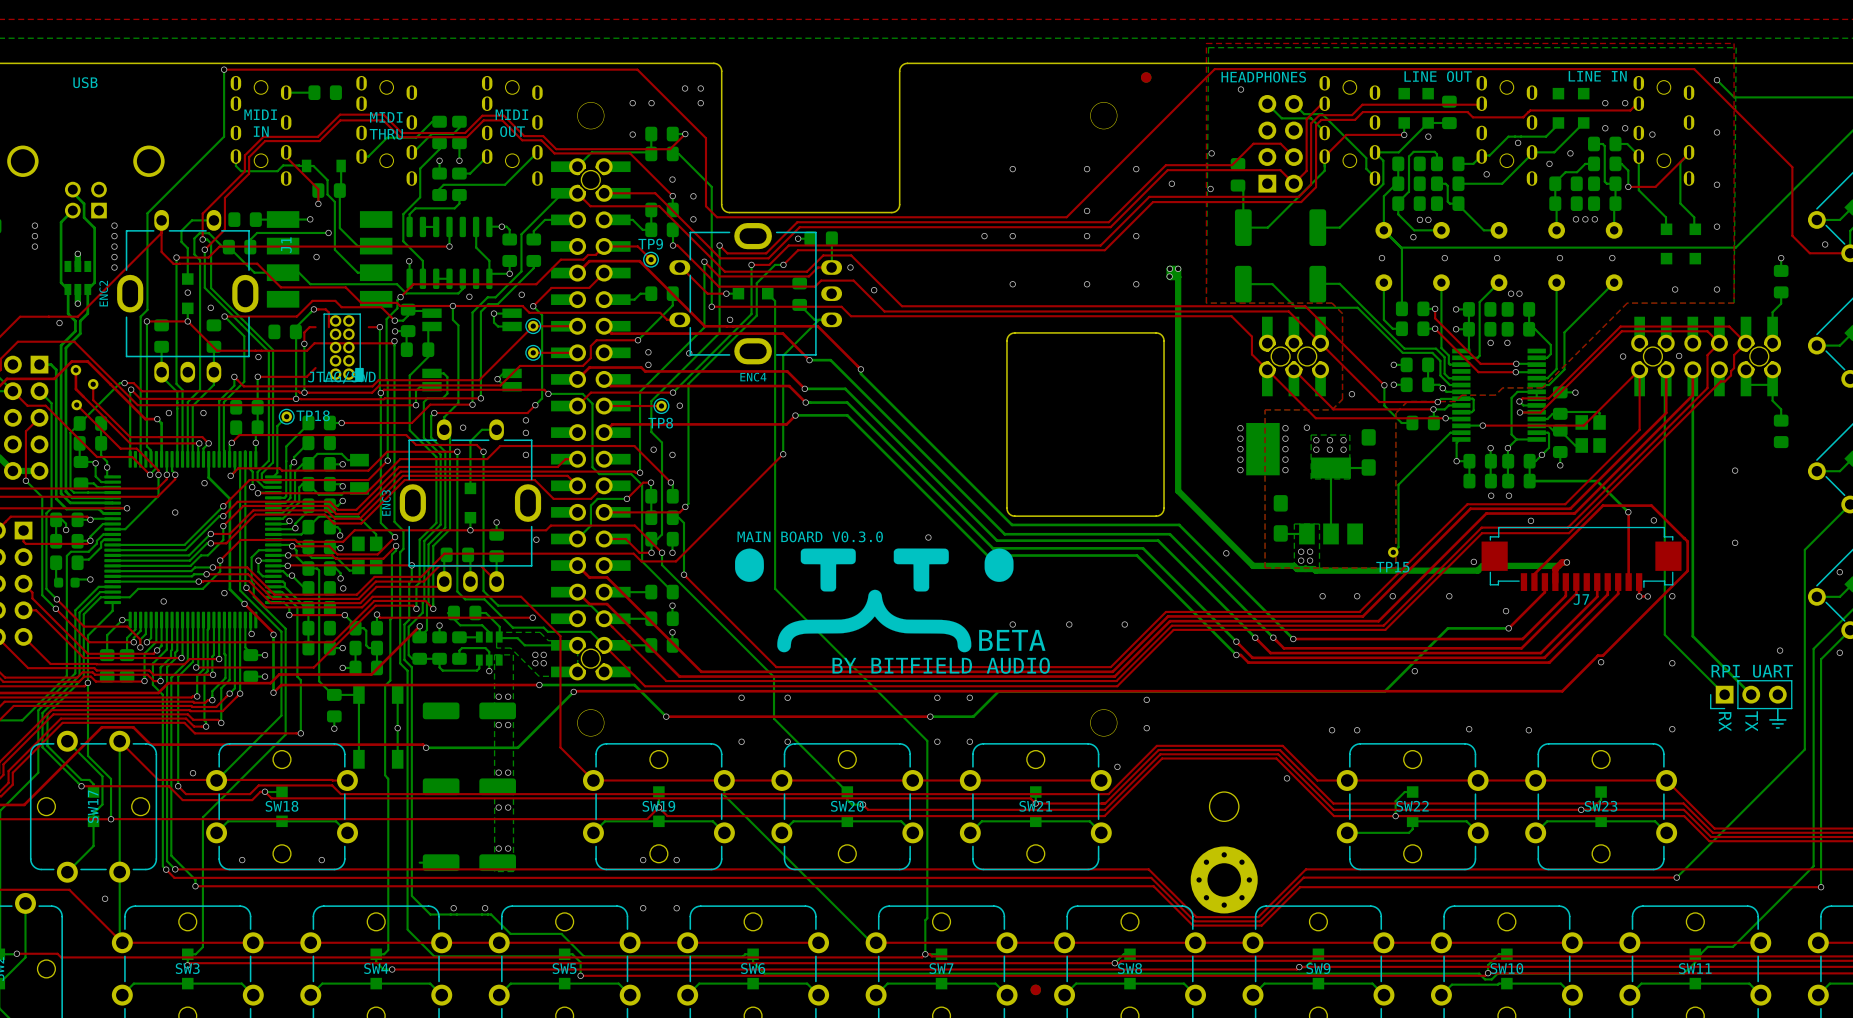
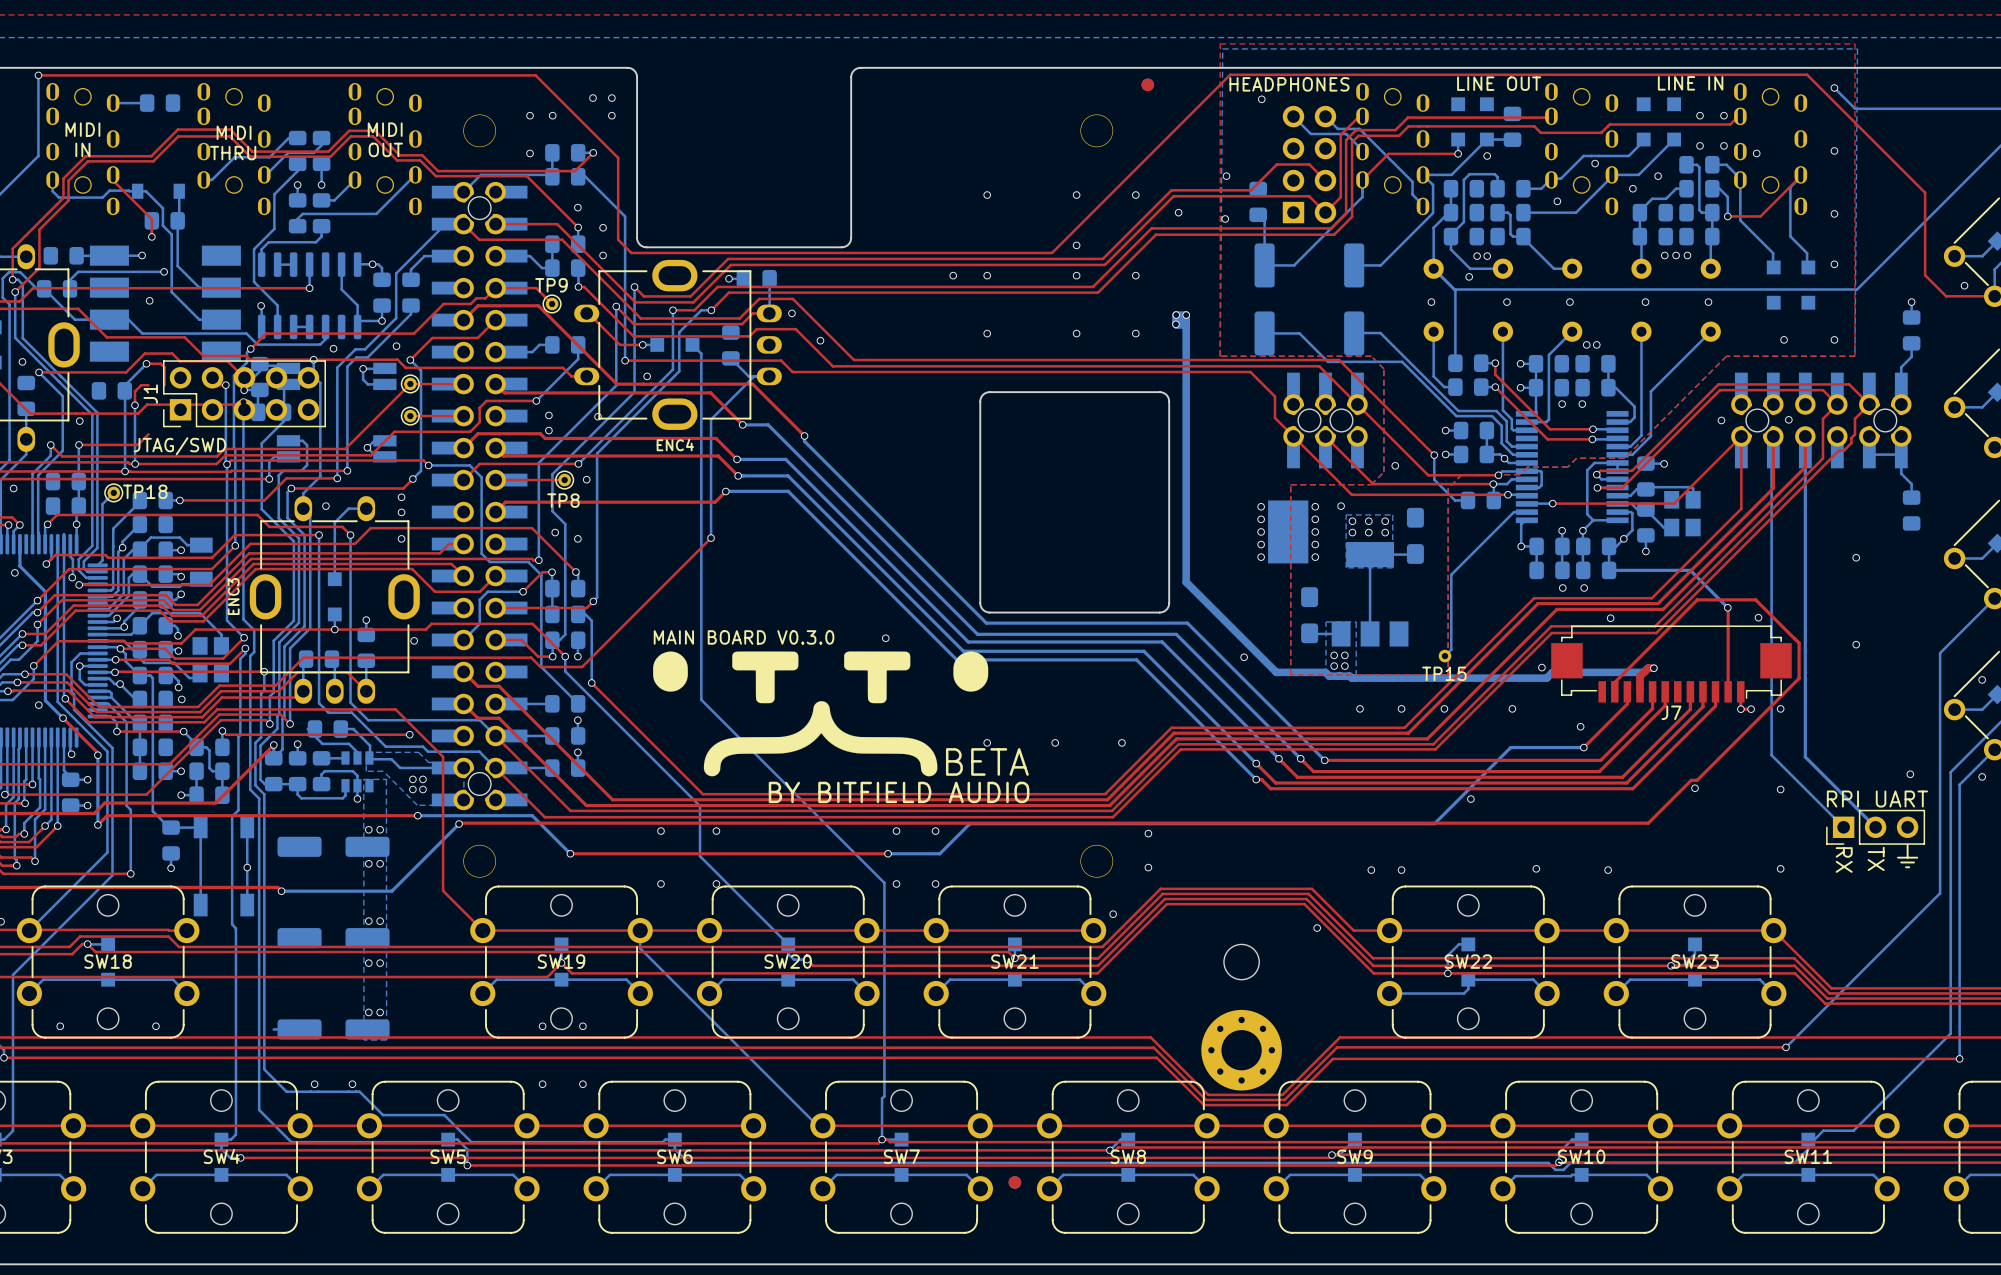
J1 name position: J1 (286, 245) -> J1 (150, 394)
J1 footprint: [323, 313, 364, 382] -> [163, 360, 326, 428]

